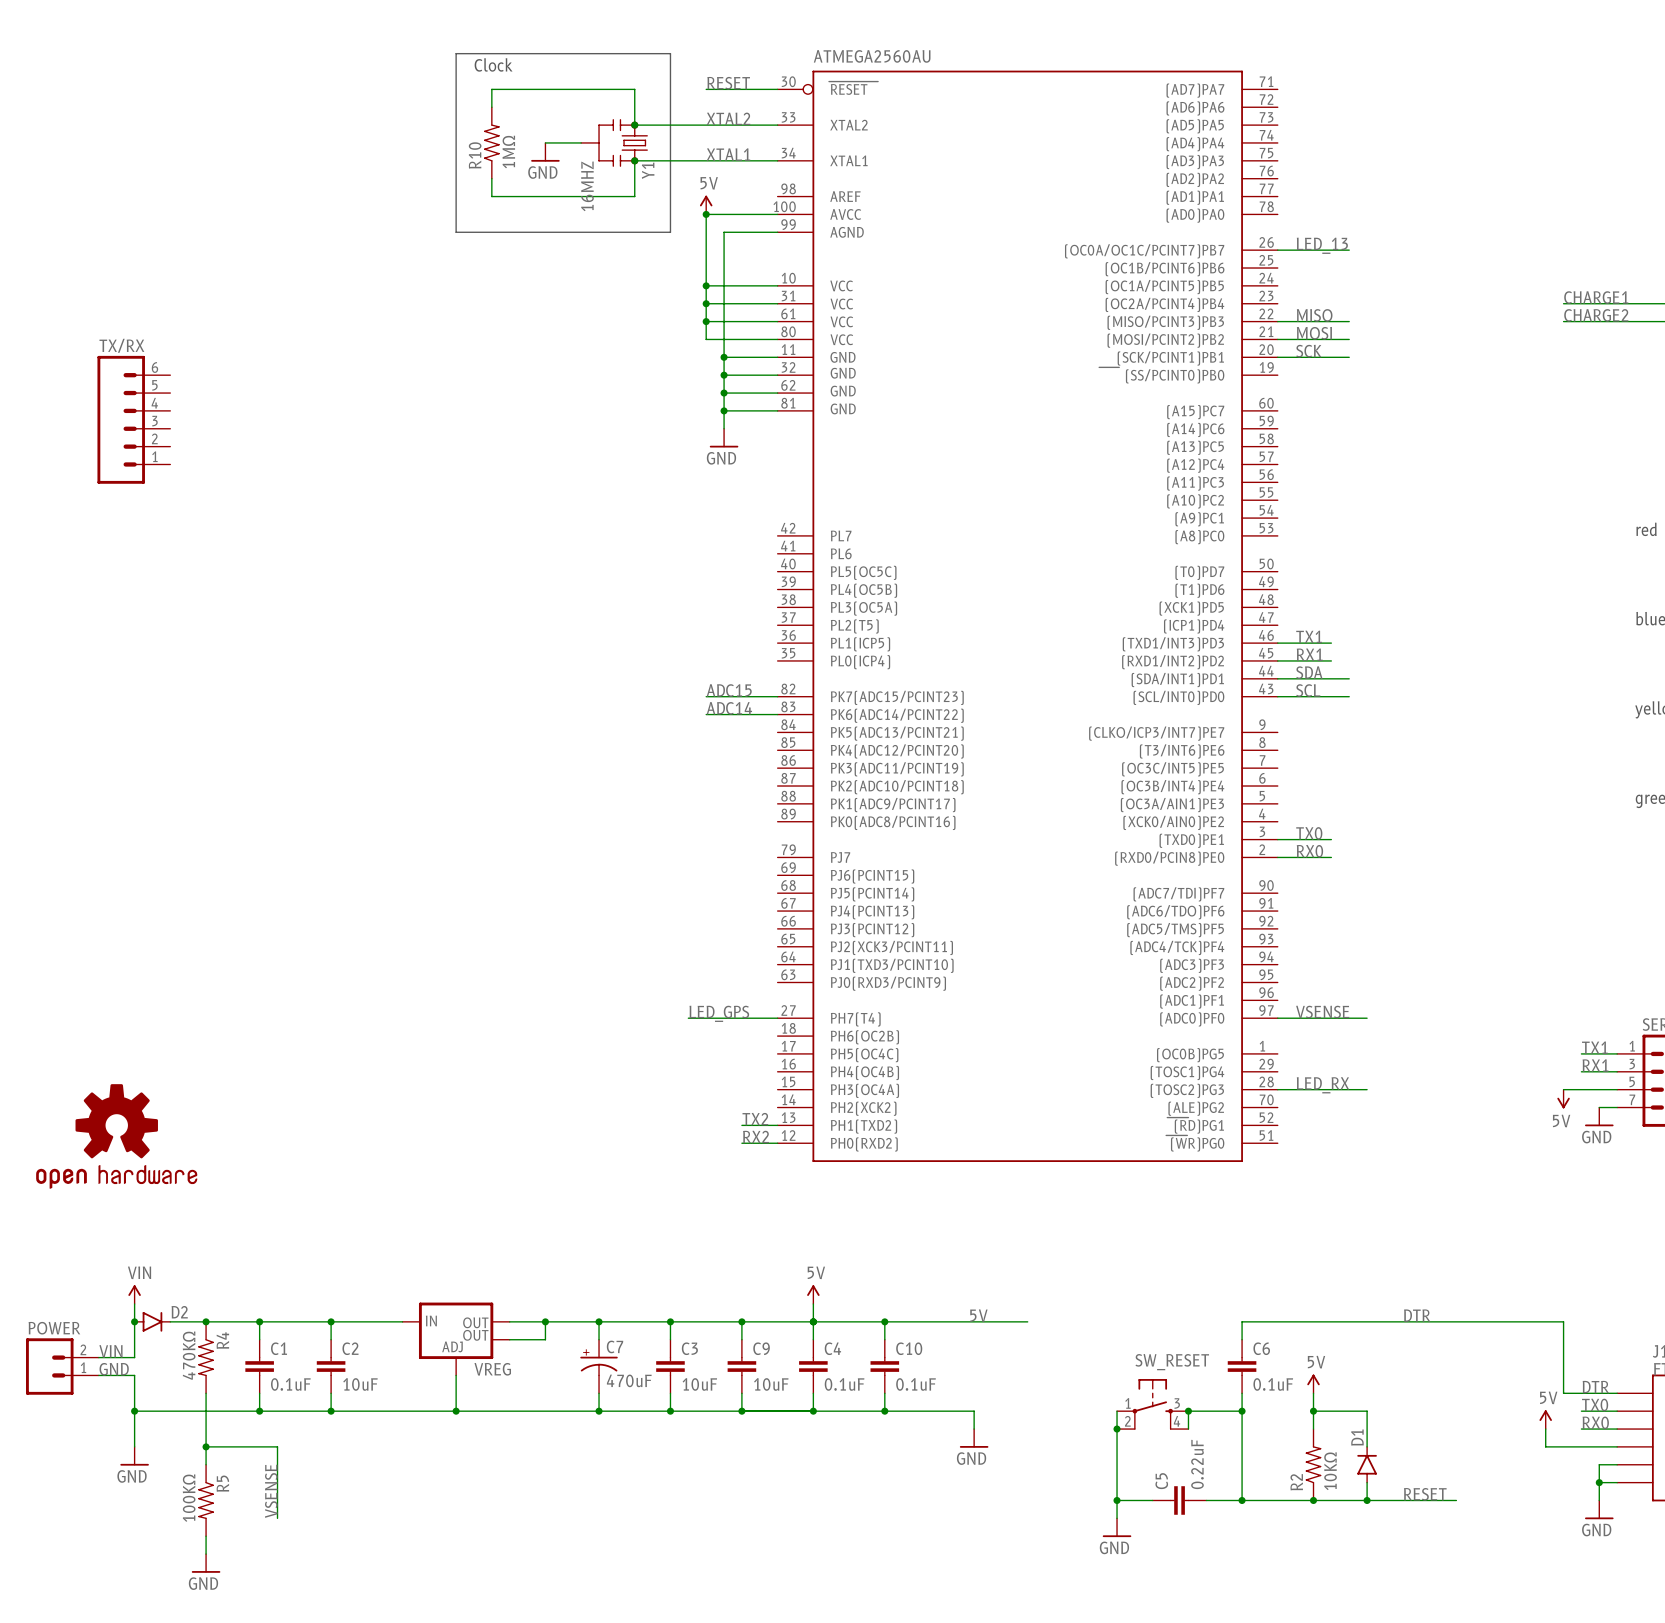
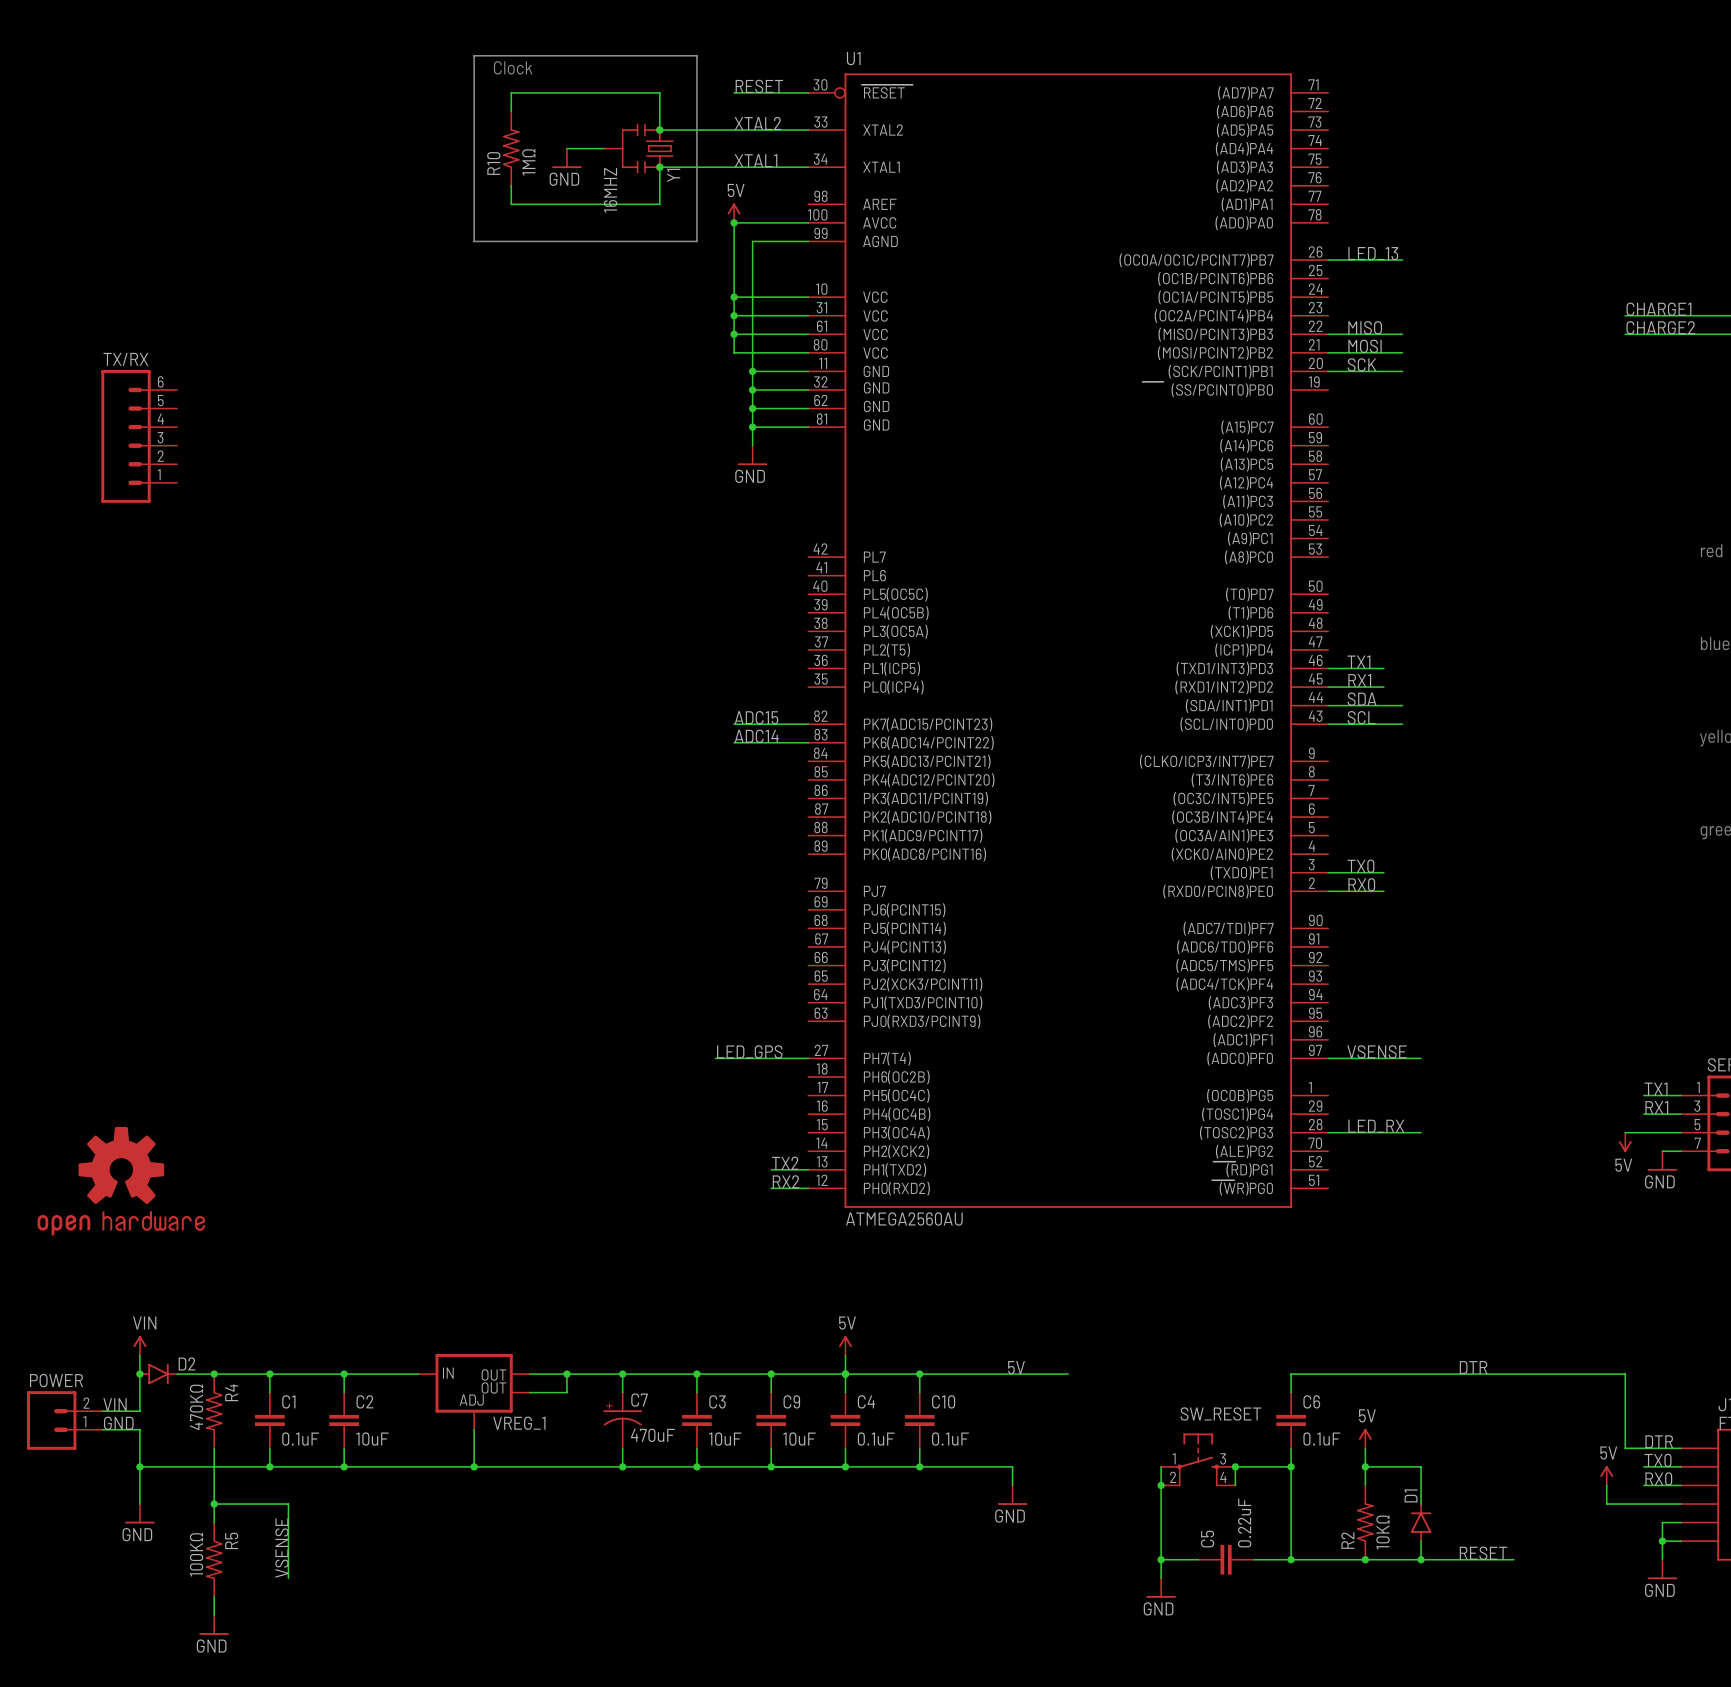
ATMEGA2560AU name: ATMEGA2560AU (872, 56) -> U1 (853, 58)
ATMEGA2560AU value: none -> ATMEGA2560AU (904, 1219)
VREG name: VREG (492, 1369) -> VREG_1 (519, 1423)

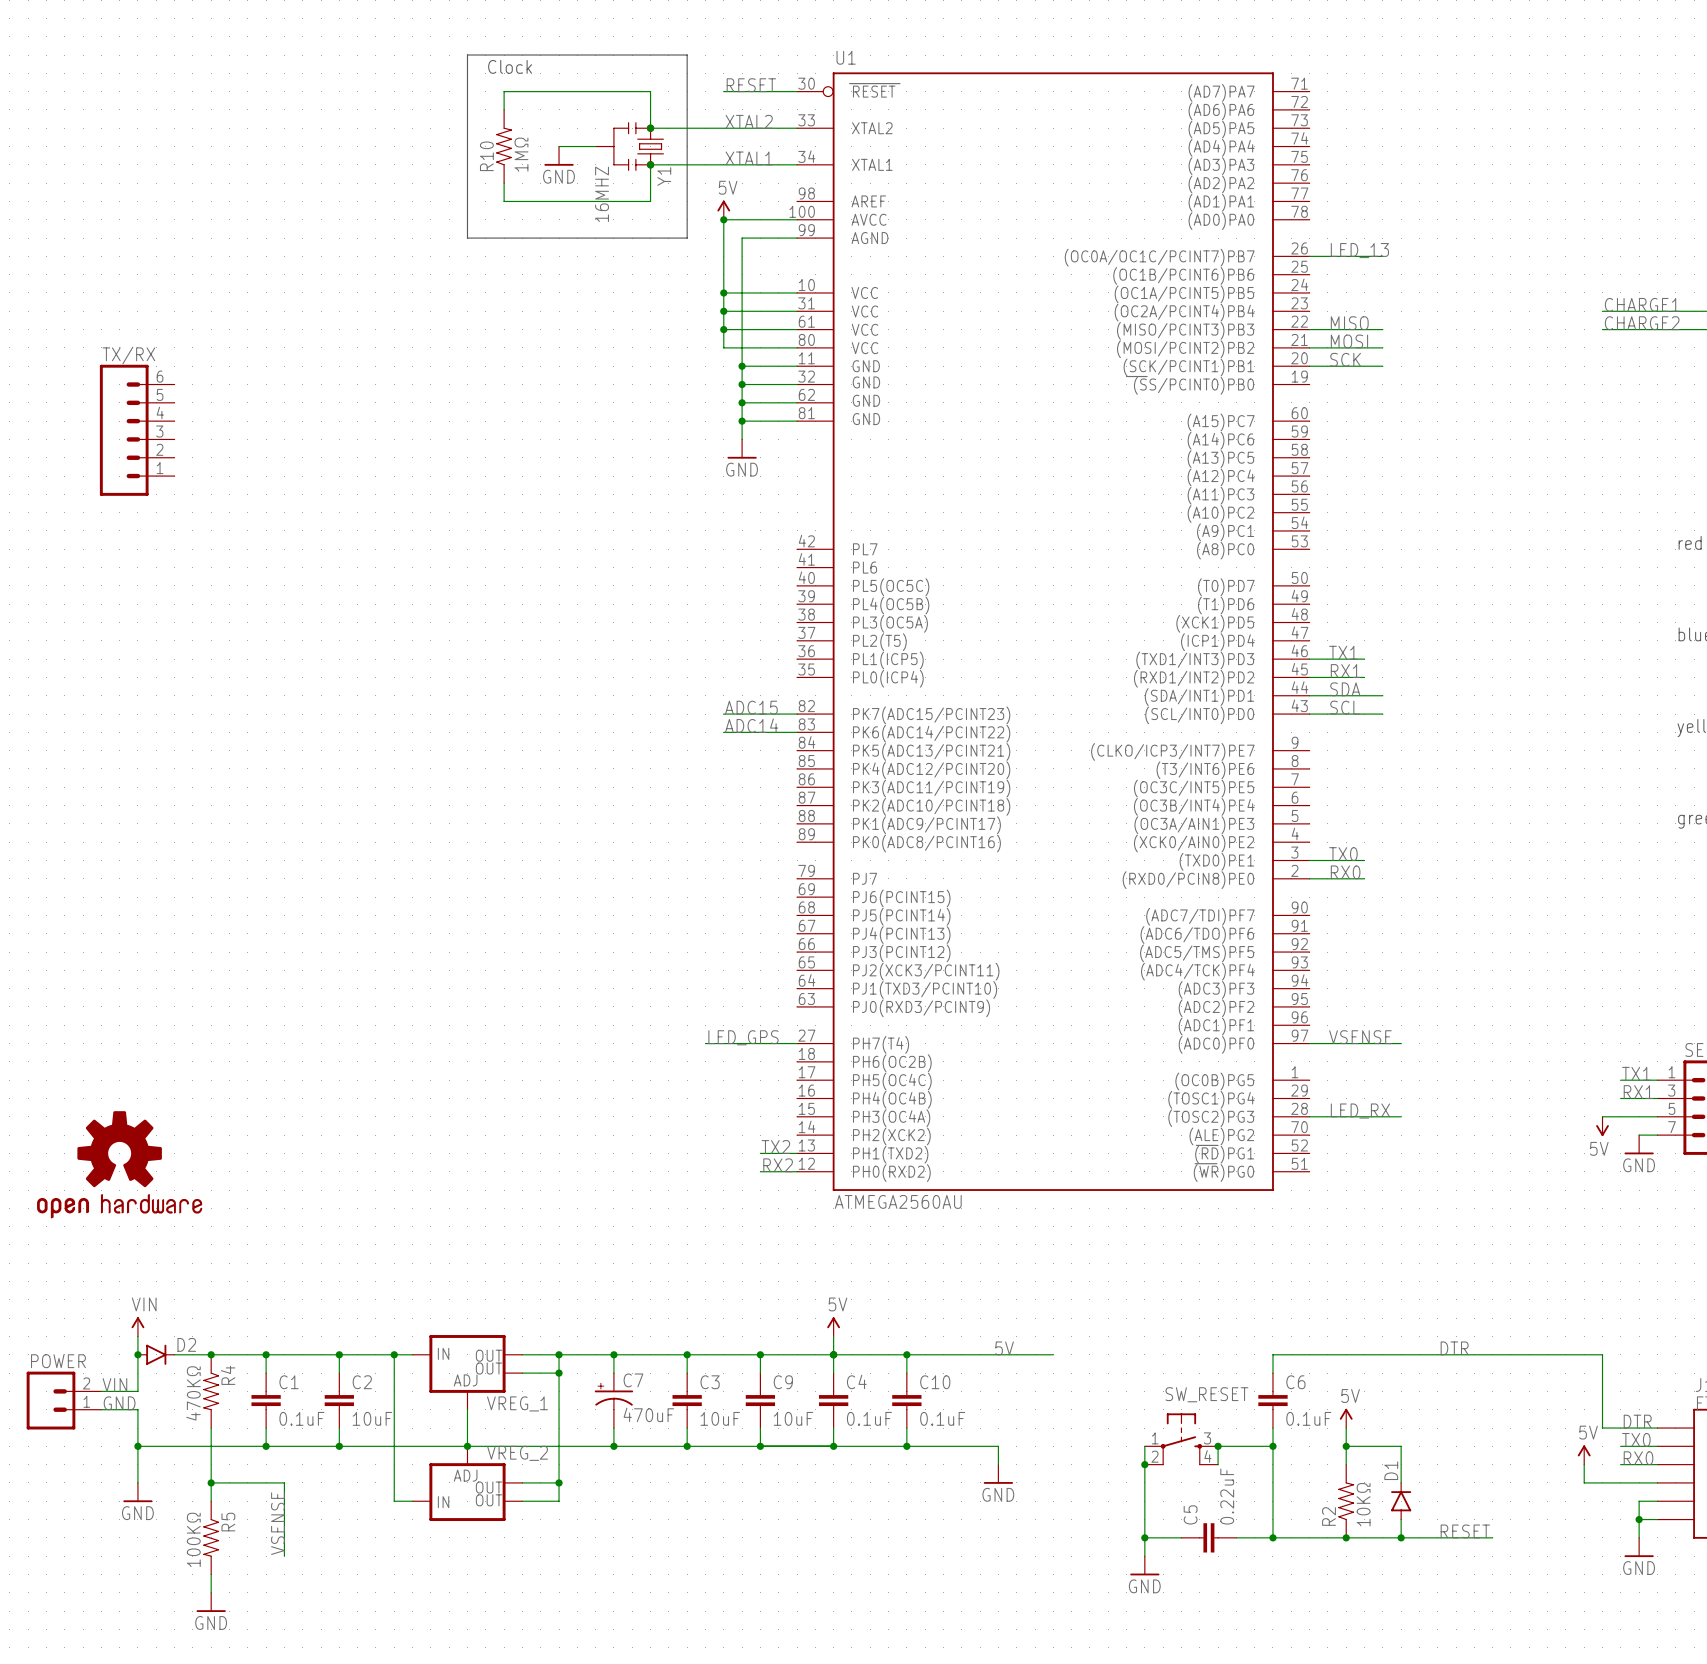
wire: none -> (394, 1354) (394, 1501) (412, 1501)
junction: none -> (394, 1354)
wire: none -> (559, 1373) (559, 1501) (522, 1501)
junction: none -> (559, 1373)
VREG_2: none -> (467, 1483)
wire: none -> (522, 1482) (559, 1482)
junction: none -> (559, 1482)

